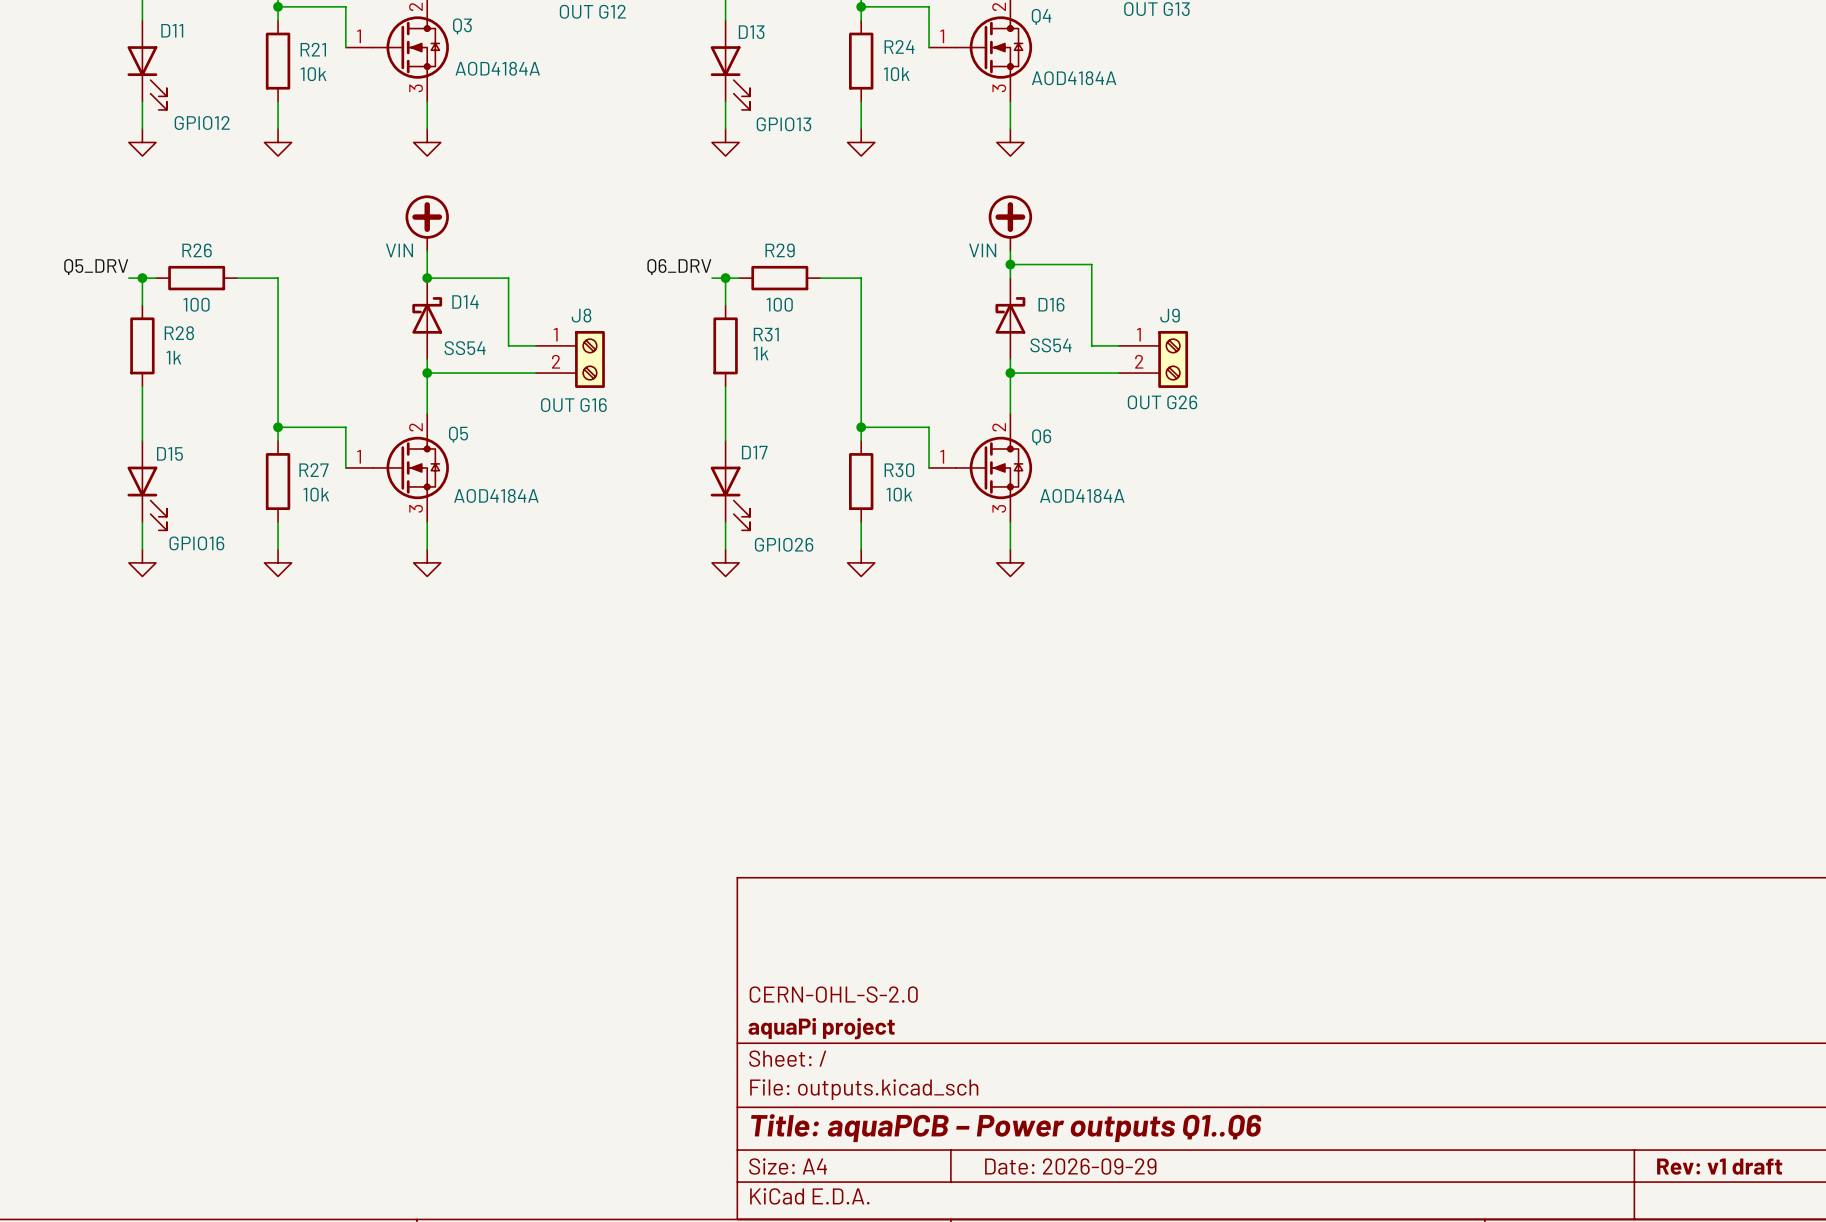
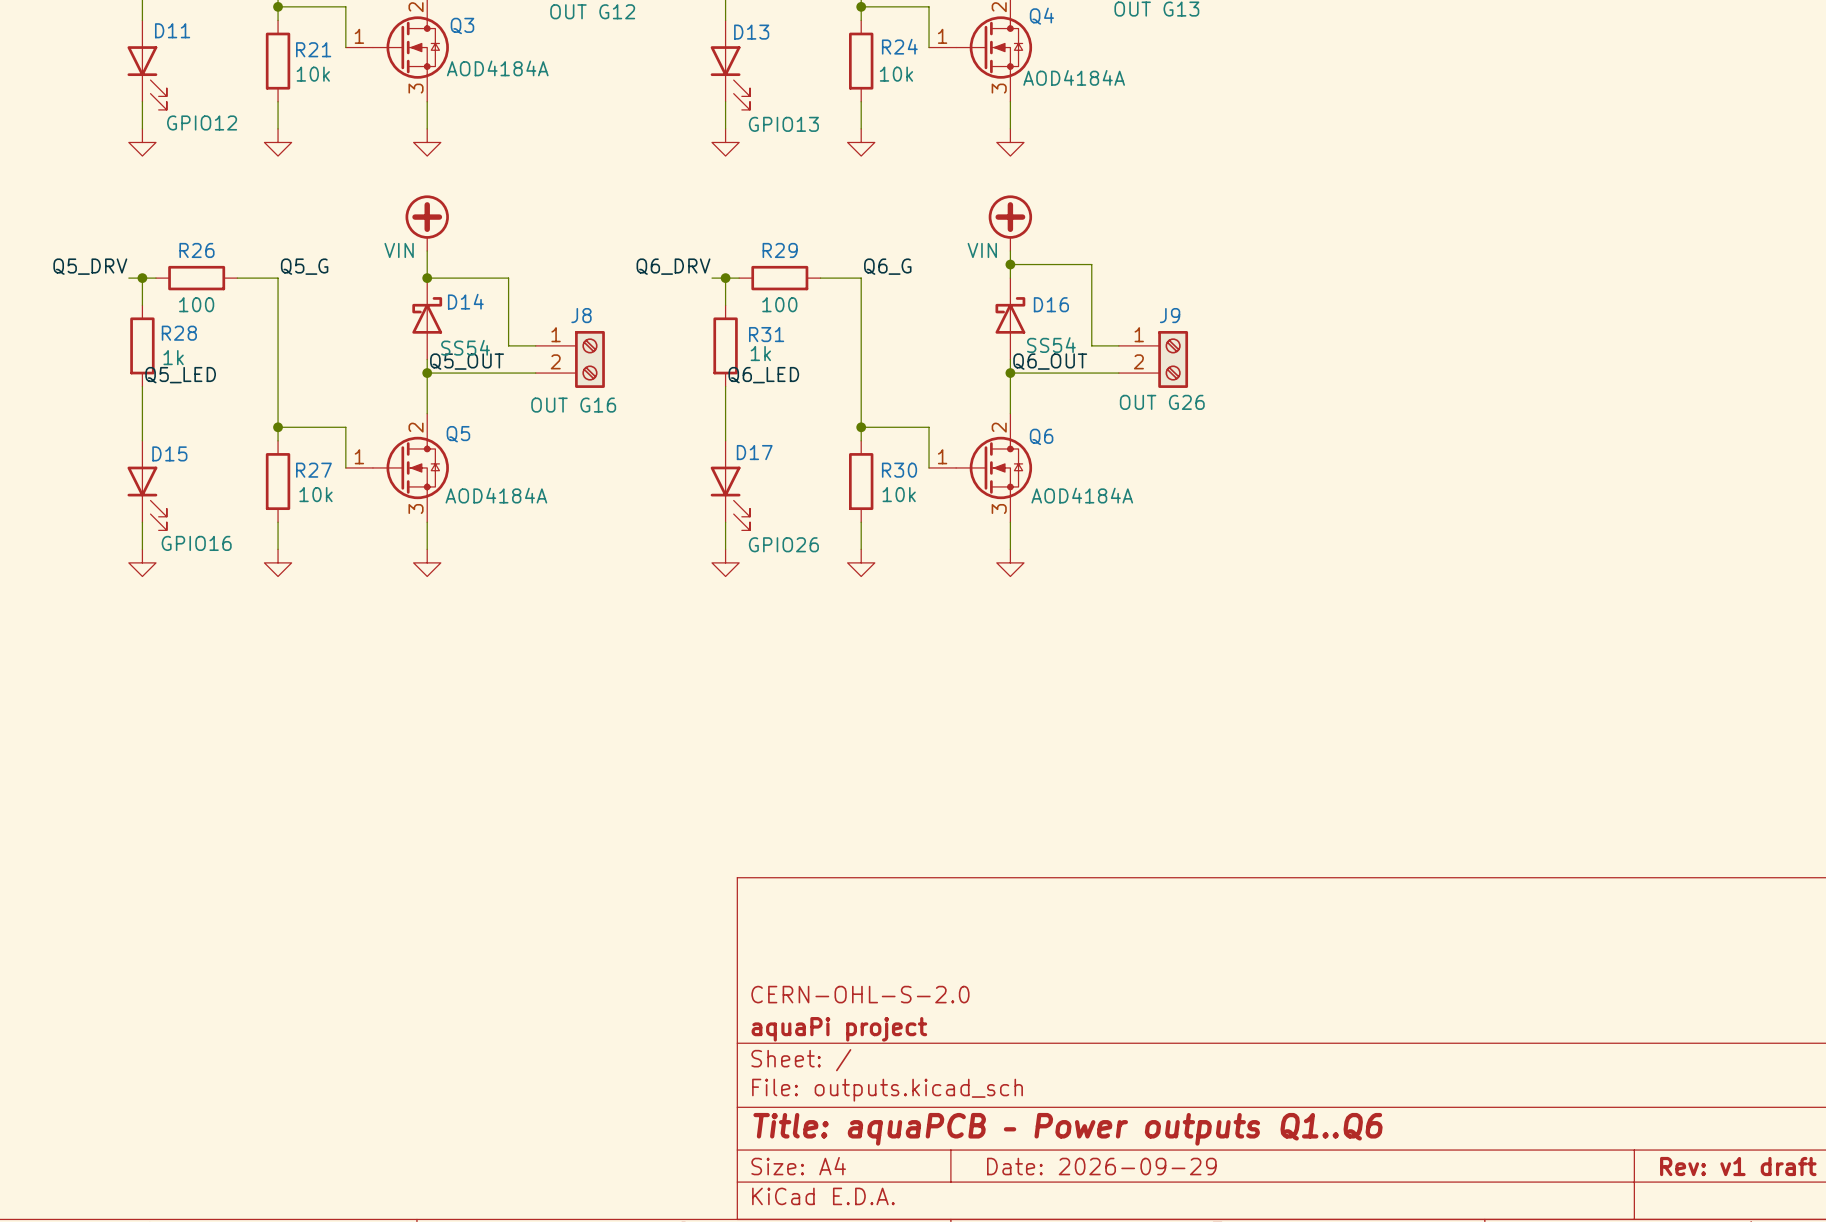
label: none -> Q5_G (304, 266)
label: none -> Q6_G (887, 266)
label: none -> Q5_OUT (467, 361)
label: none -> Q6_OUT (1050, 361)
label: none -> Q5_LED (180, 375)
label: none -> Q6_LED (763, 375)

